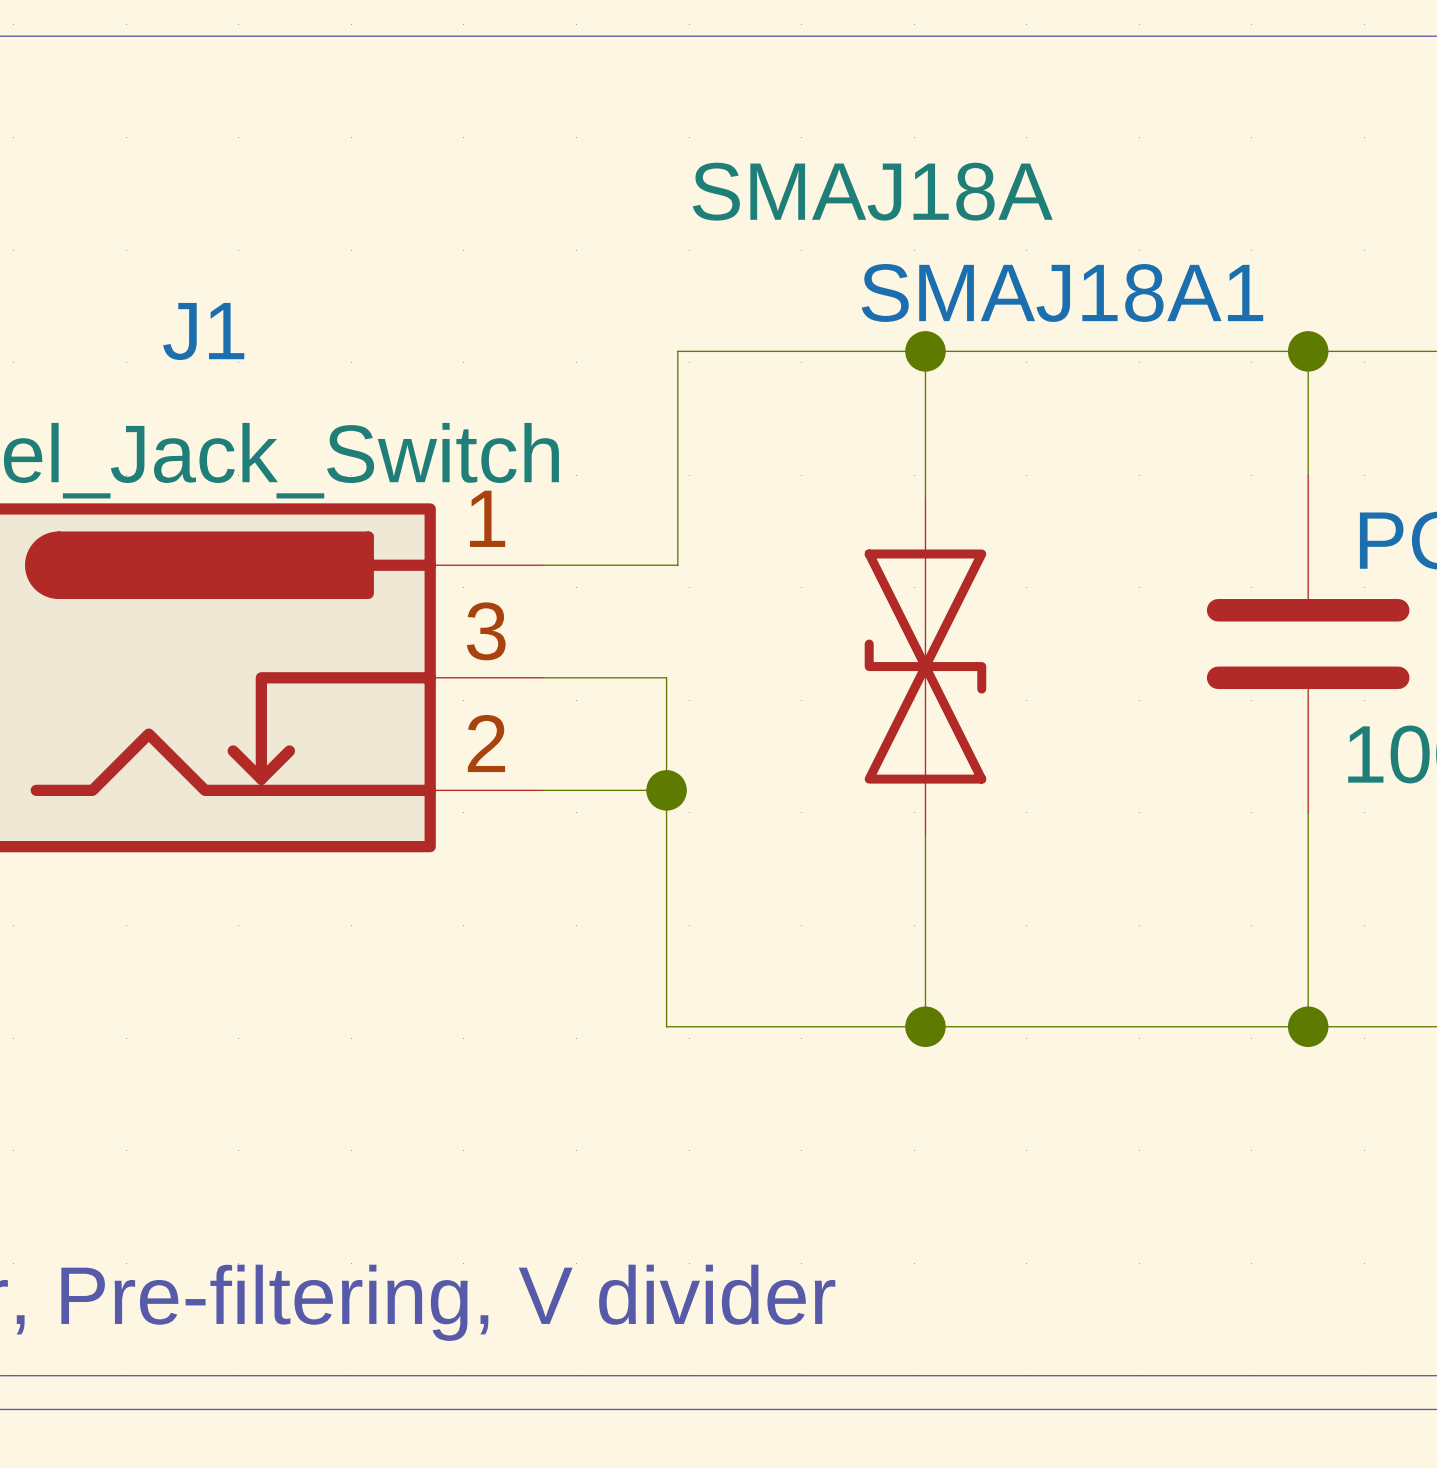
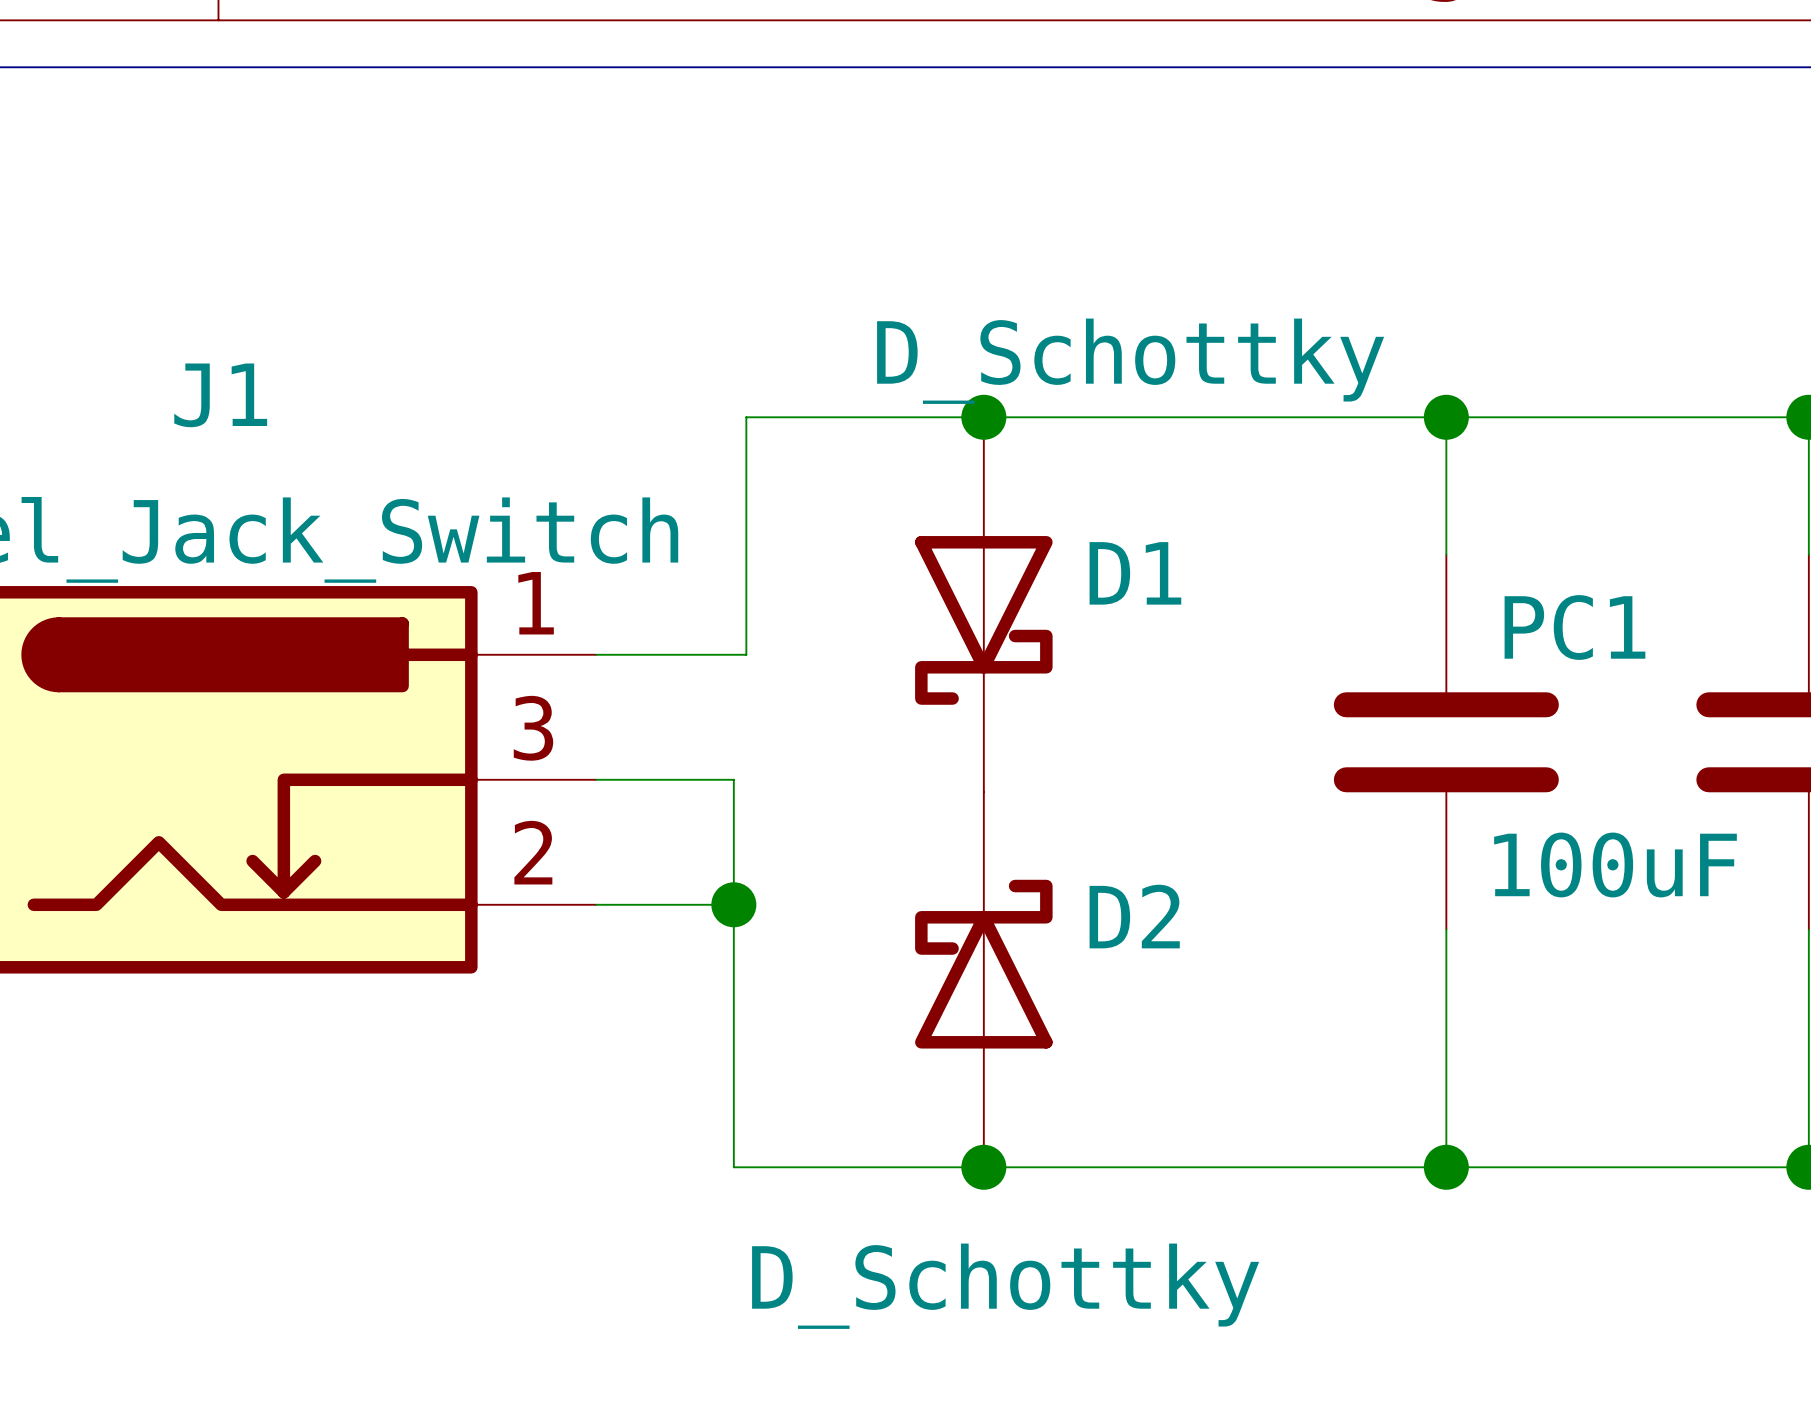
wire: (925, 351) (925, 497) -> none
junction position: (925, 351) -> (983, 417)
D1: none -> D_Schottky (983, 604)
SMAJ18A1: SMAJ18A (925, 666) -> none
wire: (925, 835) (925, 1026) -> none
D2: none -> D_Schottky (983, 979)
junction position: (925, 1026) -> (983, 1167)

